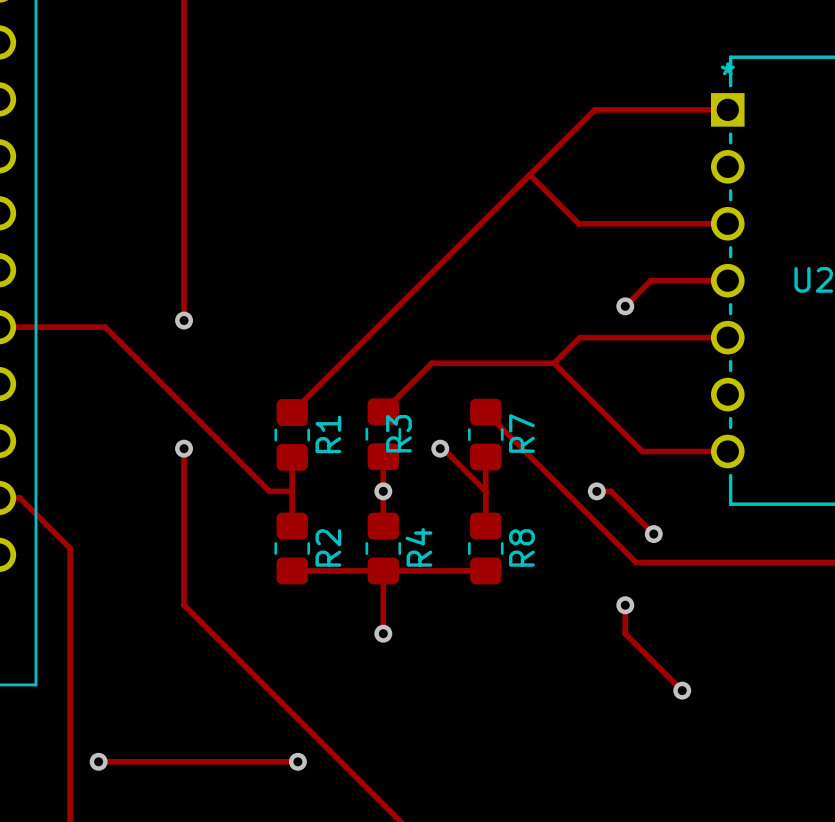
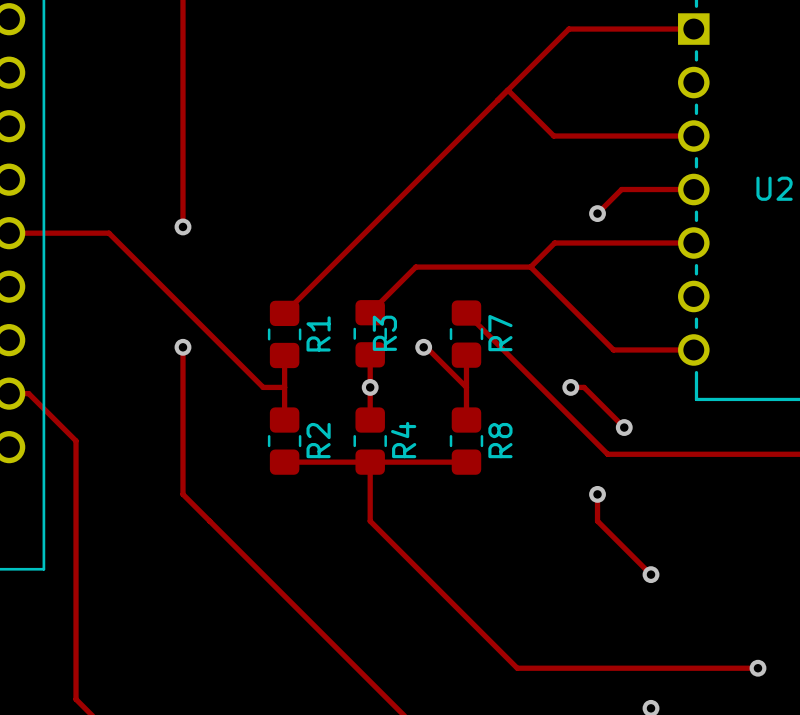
track: none -> (370, 521) (517, 668) (757, 668)
via: (383, 633) -> none
track: (98, 761) (297, 761) -> none
via: (98, 761) -> none
via: (297, 761) -> none
via: none -> (757, 668)

